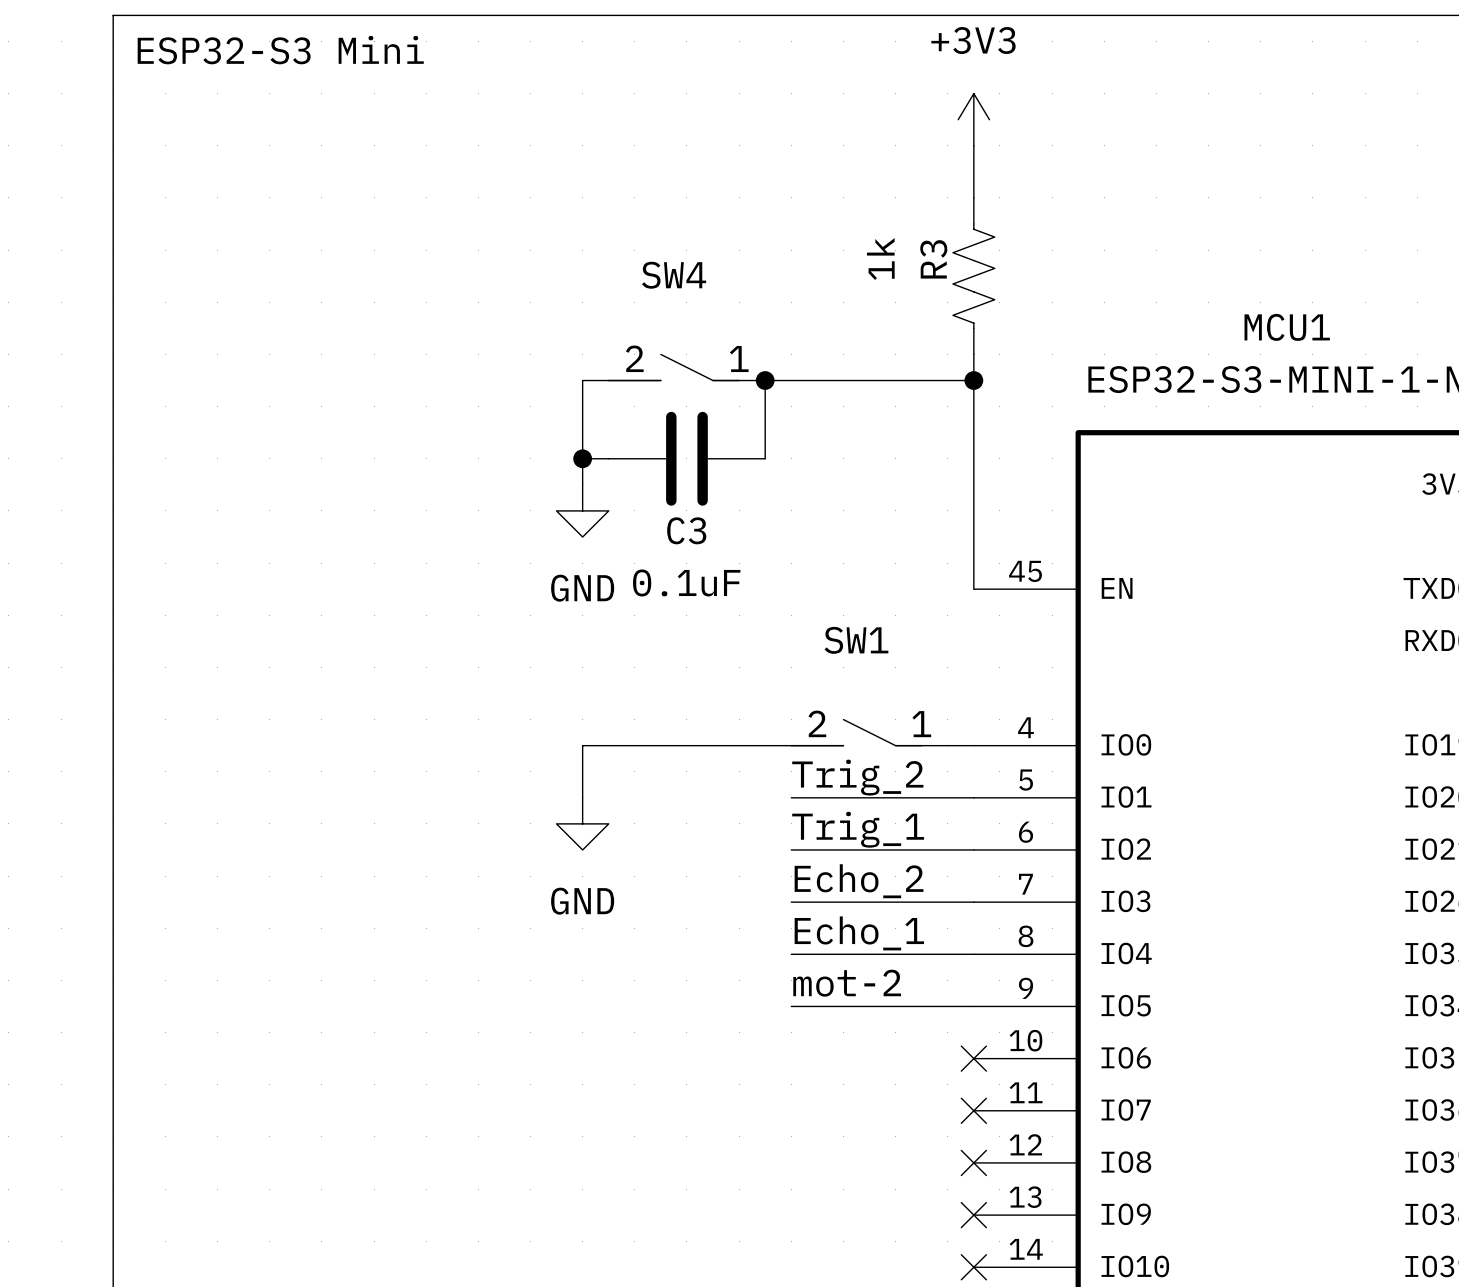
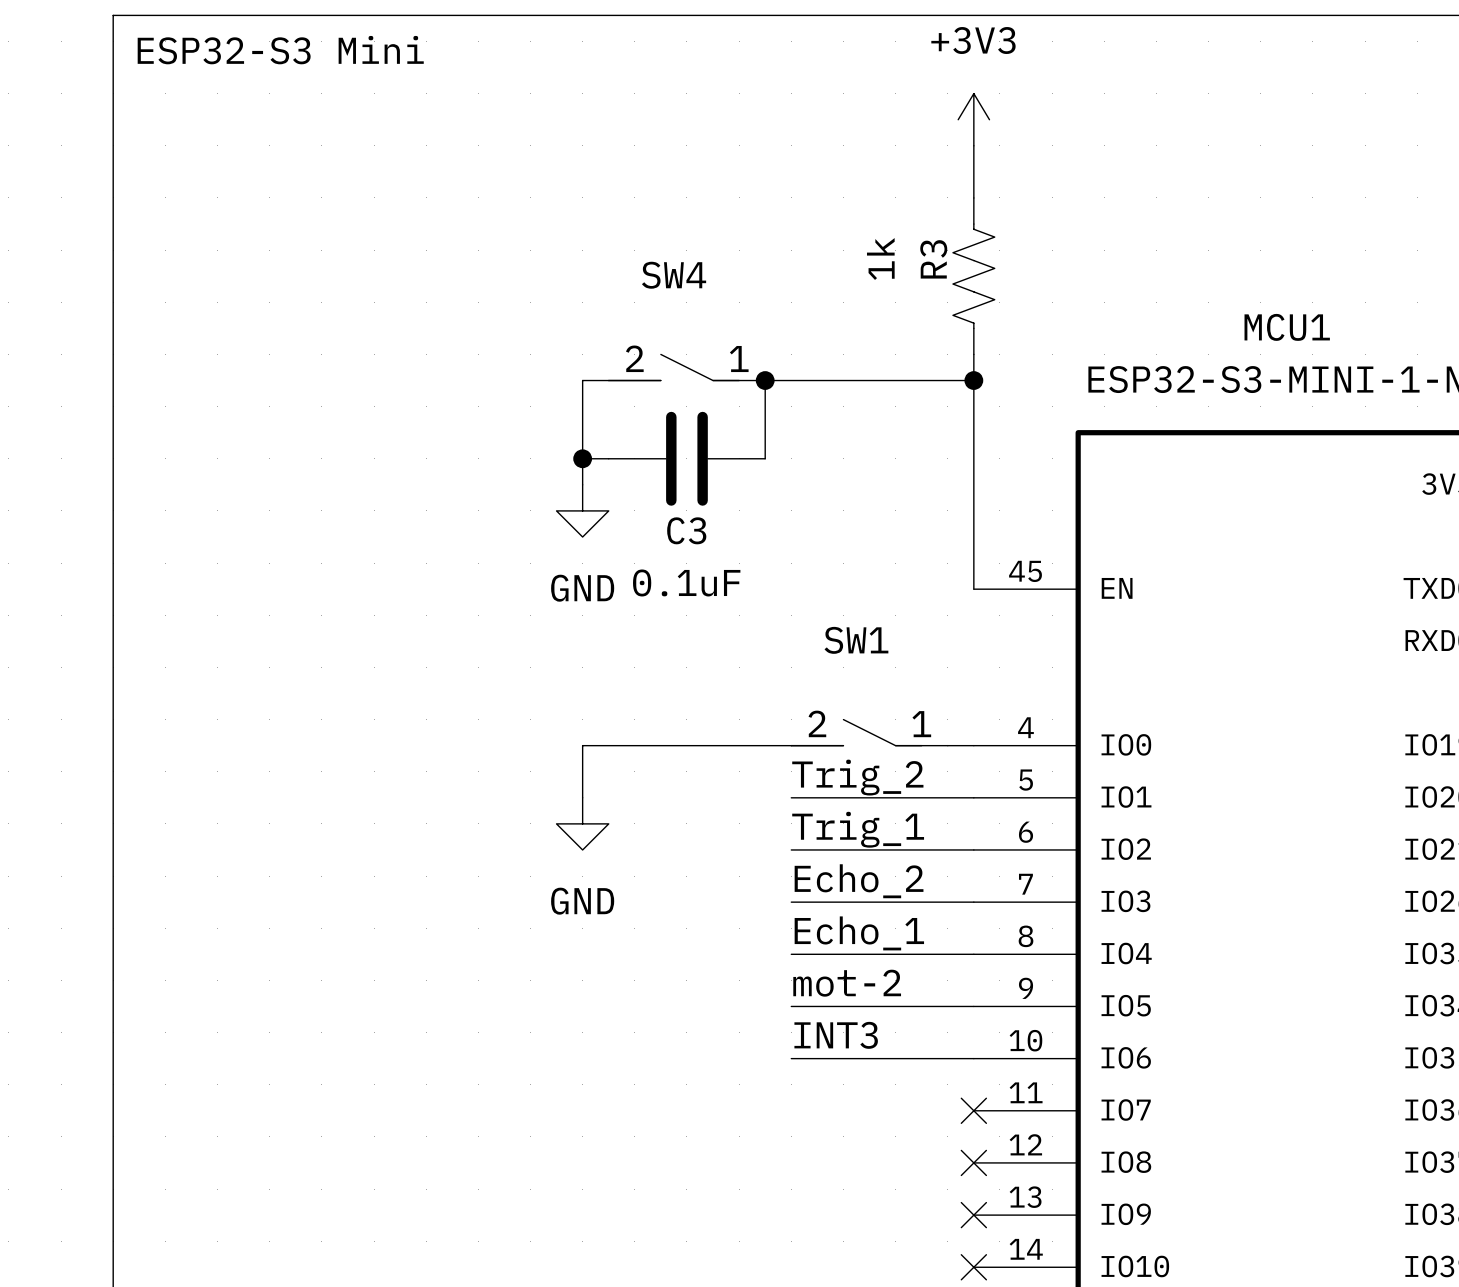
label: none -> INT3 (836, 1035)
wire: none -> (791, 1058) (973, 1058)
no-connect mark: (973, 1058) -> none

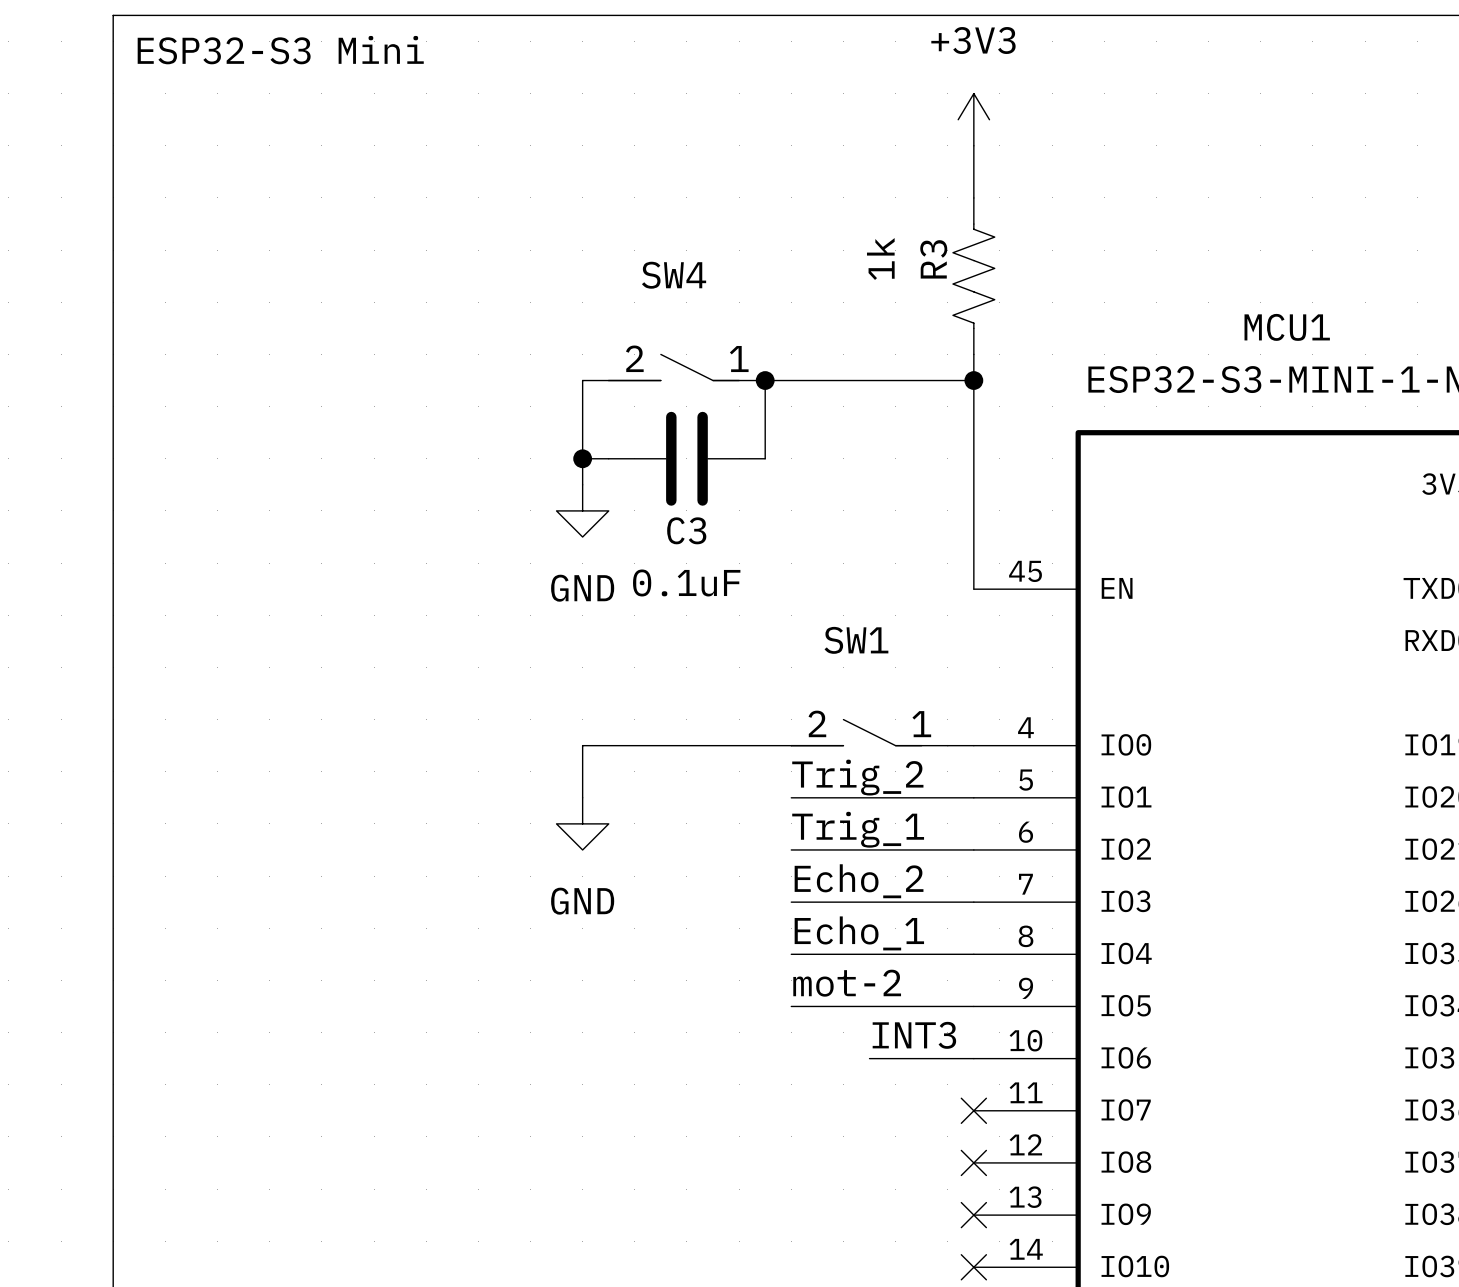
label position: INT3 (836, 1035) -> INT3 (914, 1035)
wire: (791, 1058) (869, 1058) -> none

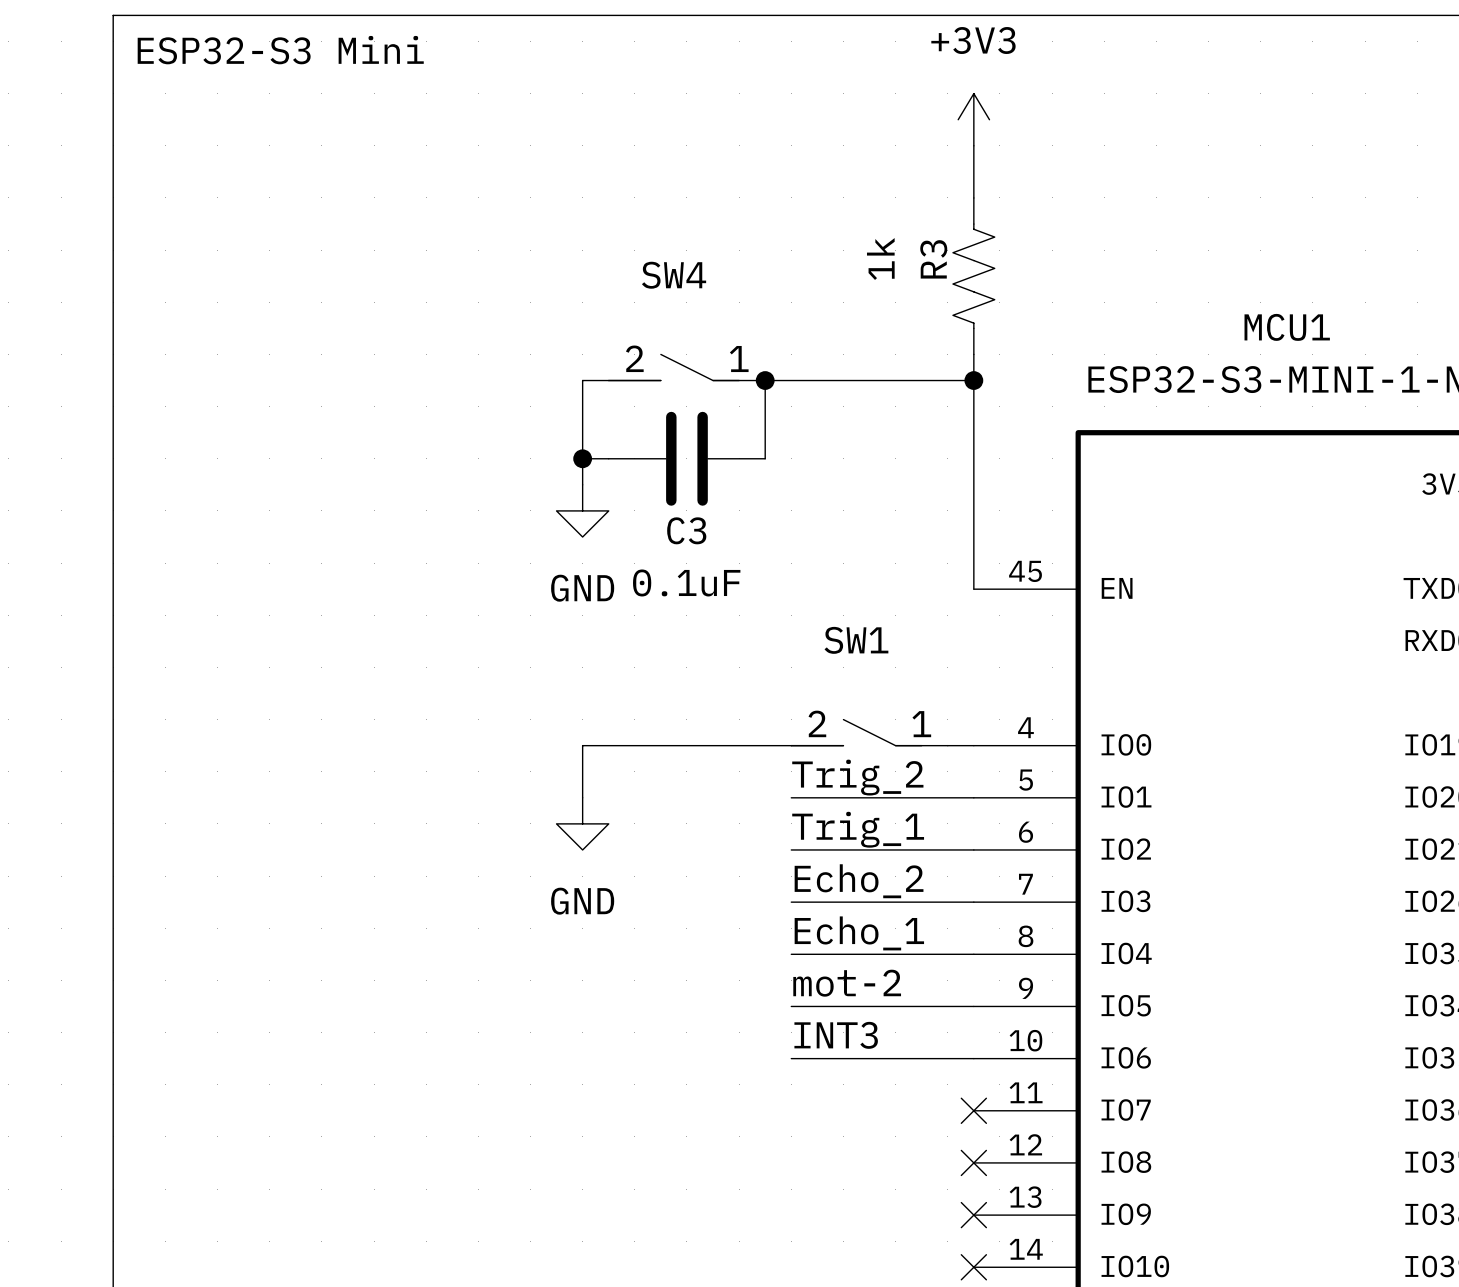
label position: INT3 (914, 1035) -> INT3 (836, 1035)
wire: none -> (791, 1058) (869, 1058)

